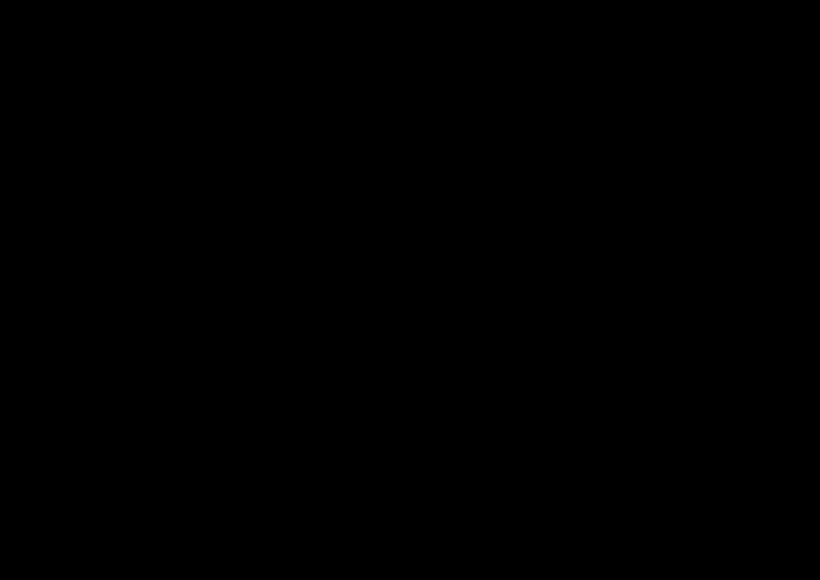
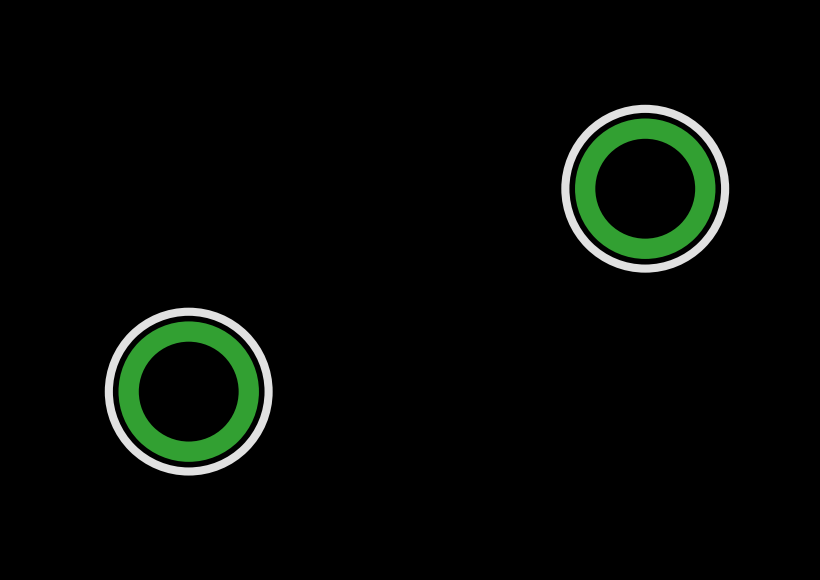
part: none -> (645, 188)
part: none -> (188, 391)

